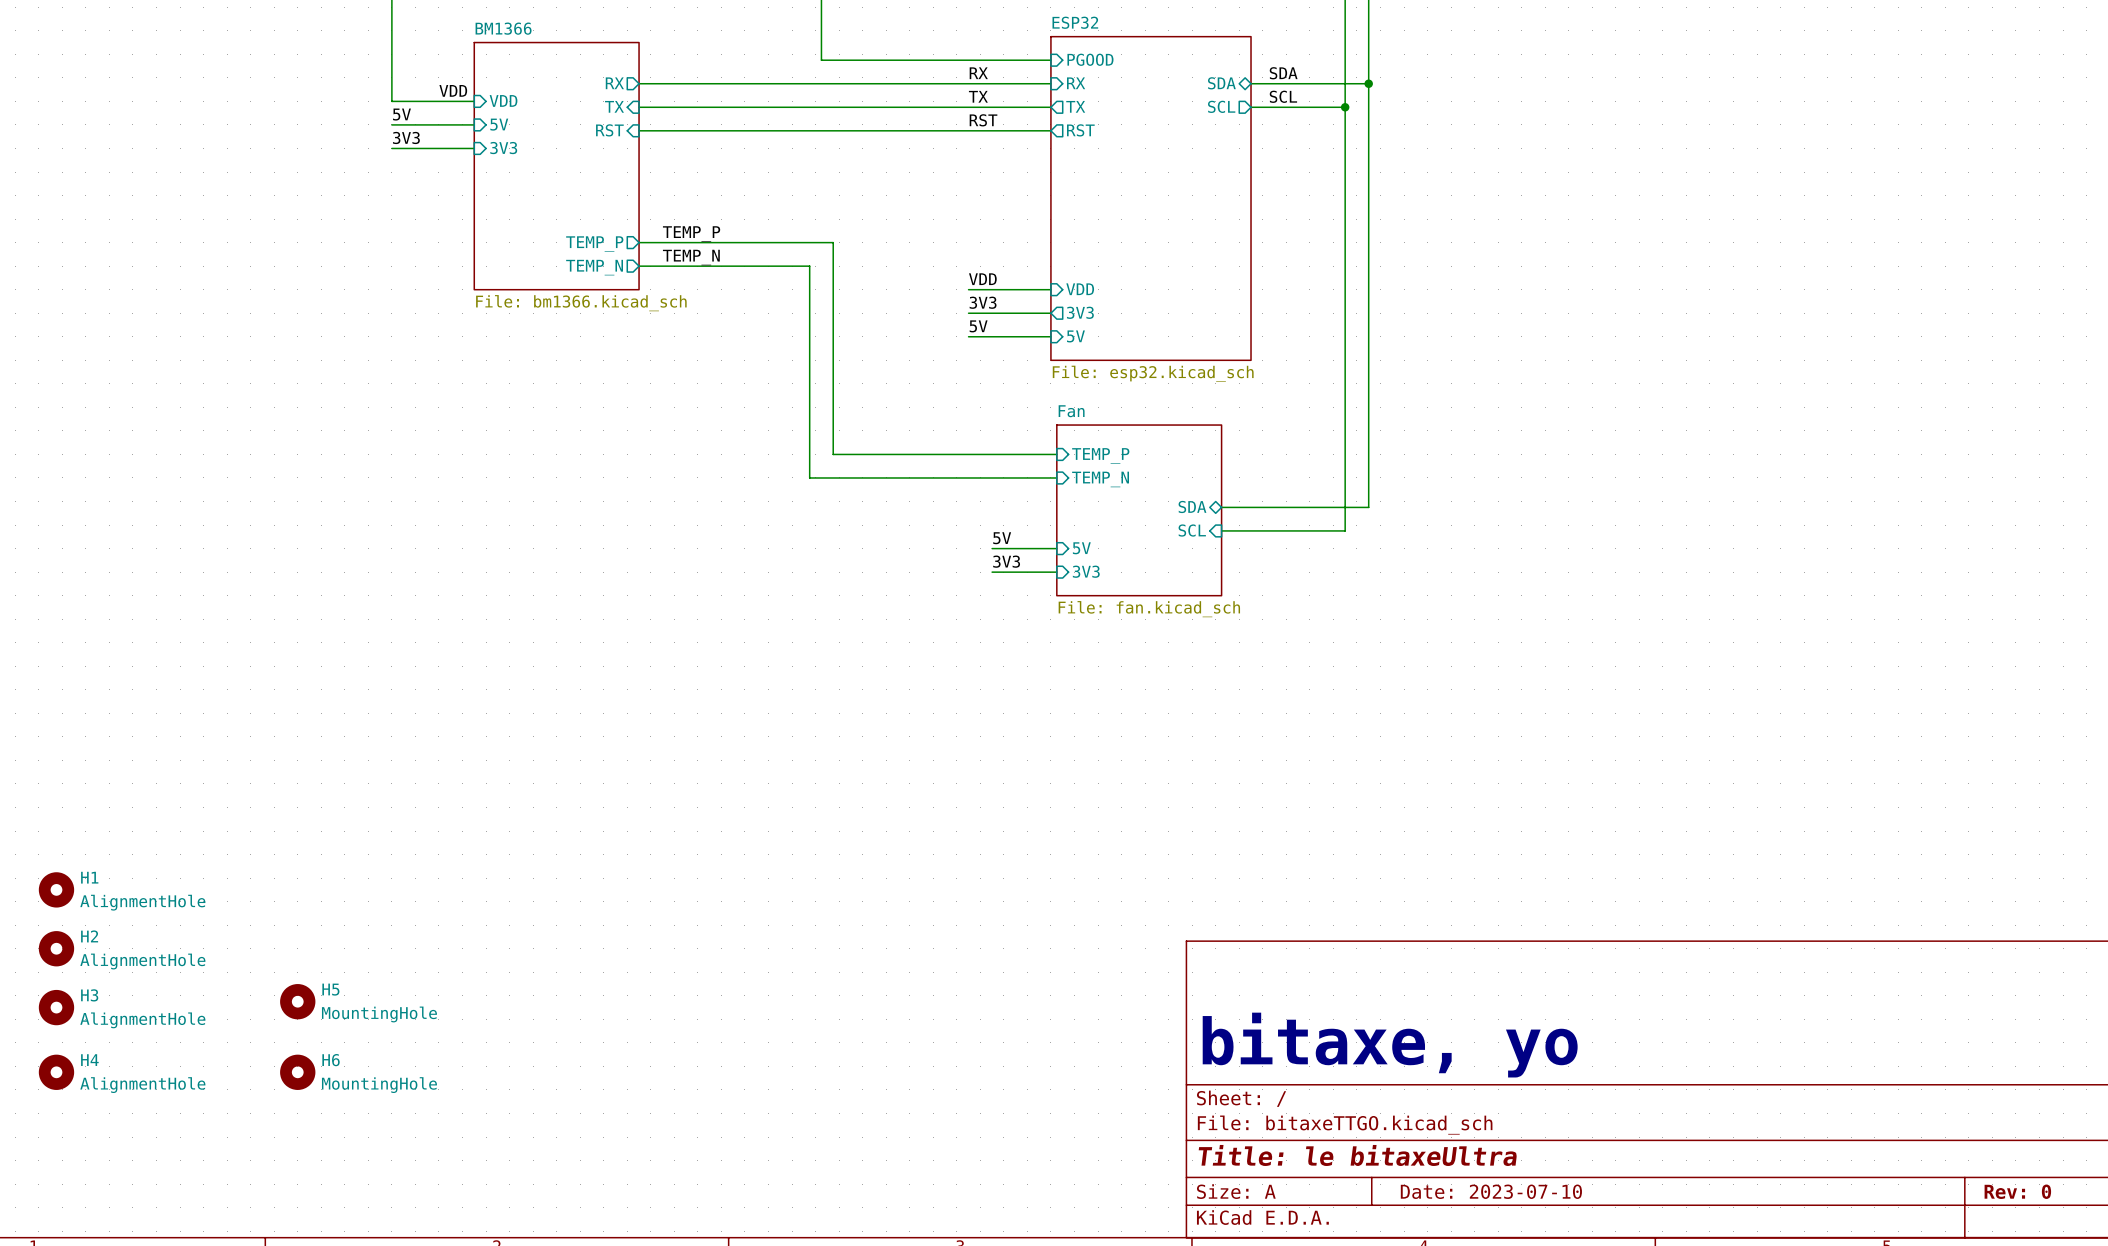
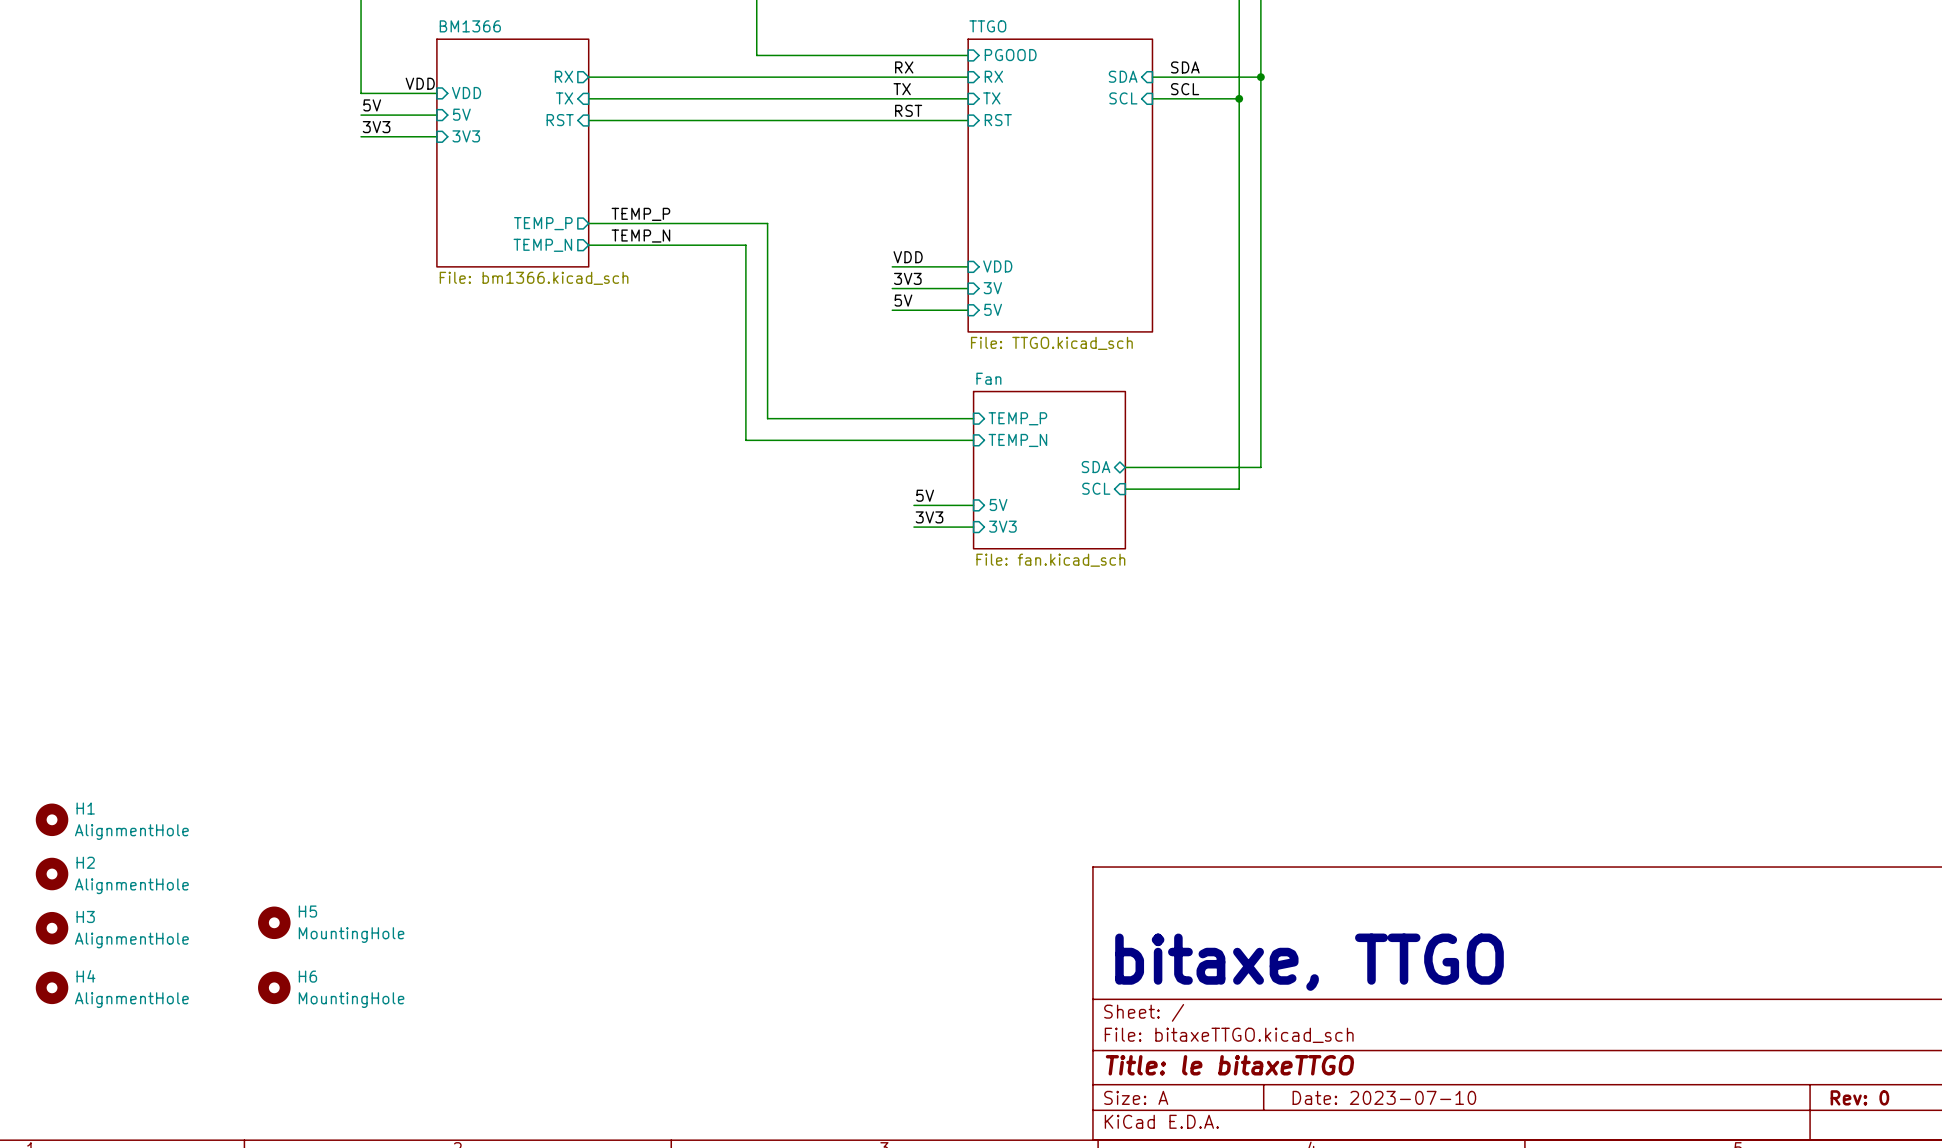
sheet pin shape: bidirectional (1221, 83) -> input (1123, 76)
sheet pin shape: output (1075, 106) -> input (991, 98)
sheet pin shape: output (1221, 106) -> input (1123, 98)
sheet pin shape: output (1080, 130) -> input (998, 120)
sheet ESP32: File: esp32.kicad_sch (1150, 198) -> none
sheet TTGO: none -> File: TTGO.kicad_sch (1060, 185)
sheet pin shape: output (1080, 312) -> input (992, 288)
sheet pin: 3V3 (1080, 312) -> 3V (992, 288)
text: bitaxe, yo (1390, 1045) -> bitaxe, TTGO (1309, 962)
title block: Title: le bitaxeUltra (1357, 1155) -> Title: le bitaxeTTGO (1229, 1065)

